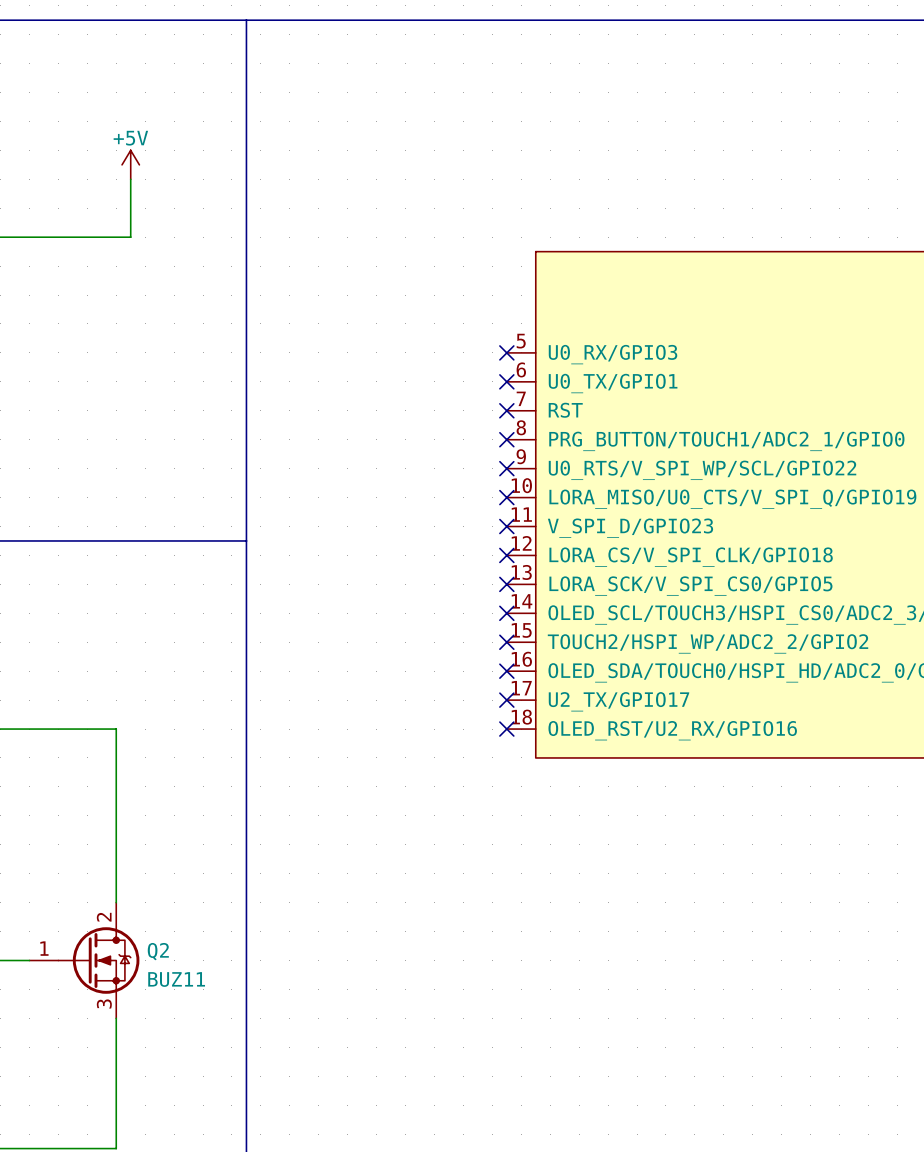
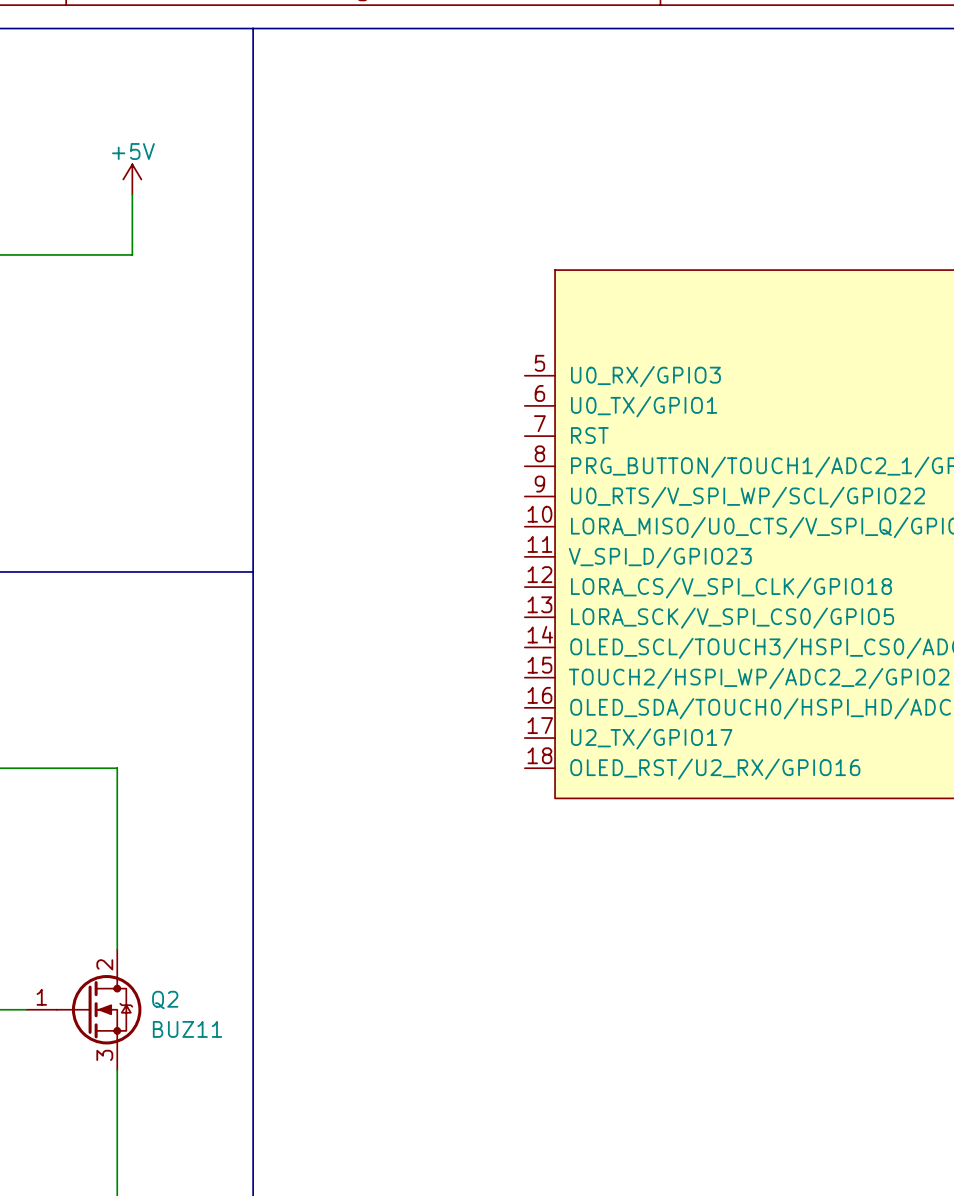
no-connect mark: (506, 352) -> none
no-connect mark: (506, 381) -> none
no-connect mark: (506, 410) -> none
no-connect mark: (506, 439) -> none
no-connect mark: (506, 468) -> none
no-connect mark: (506, 497) -> none
no-connect mark: (506, 526) -> none
no-connect mark: (506, 555) -> none
no-connect mark: (506, 584) -> none
no-connect mark: (506, 613) -> none
no-connect mark: (506, 642) -> none
no-connect mark: (506, 671) -> none
no-connect mark: (506, 700) -> none
no-connect mark: (506, 729) -> none

